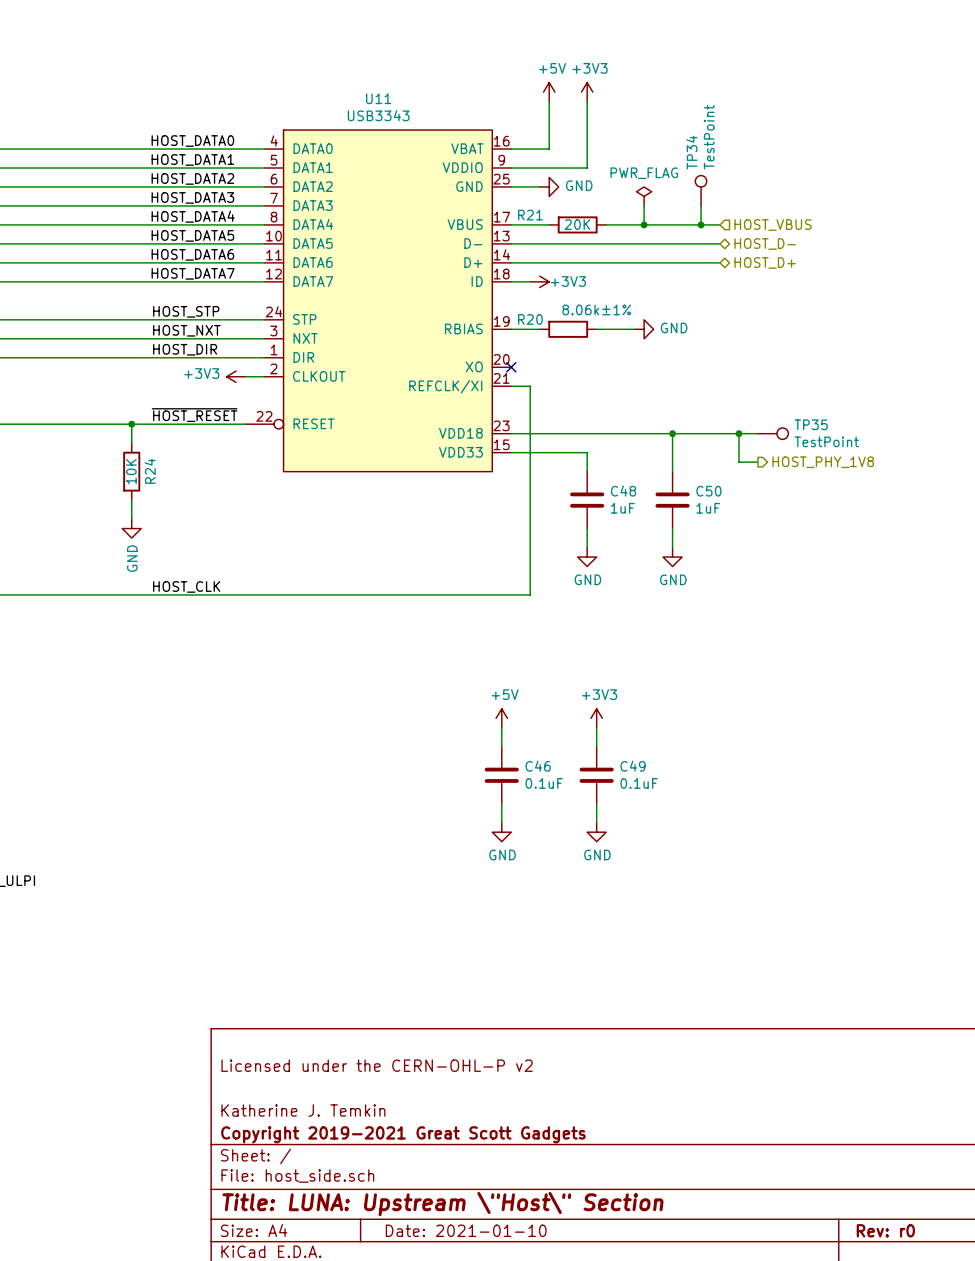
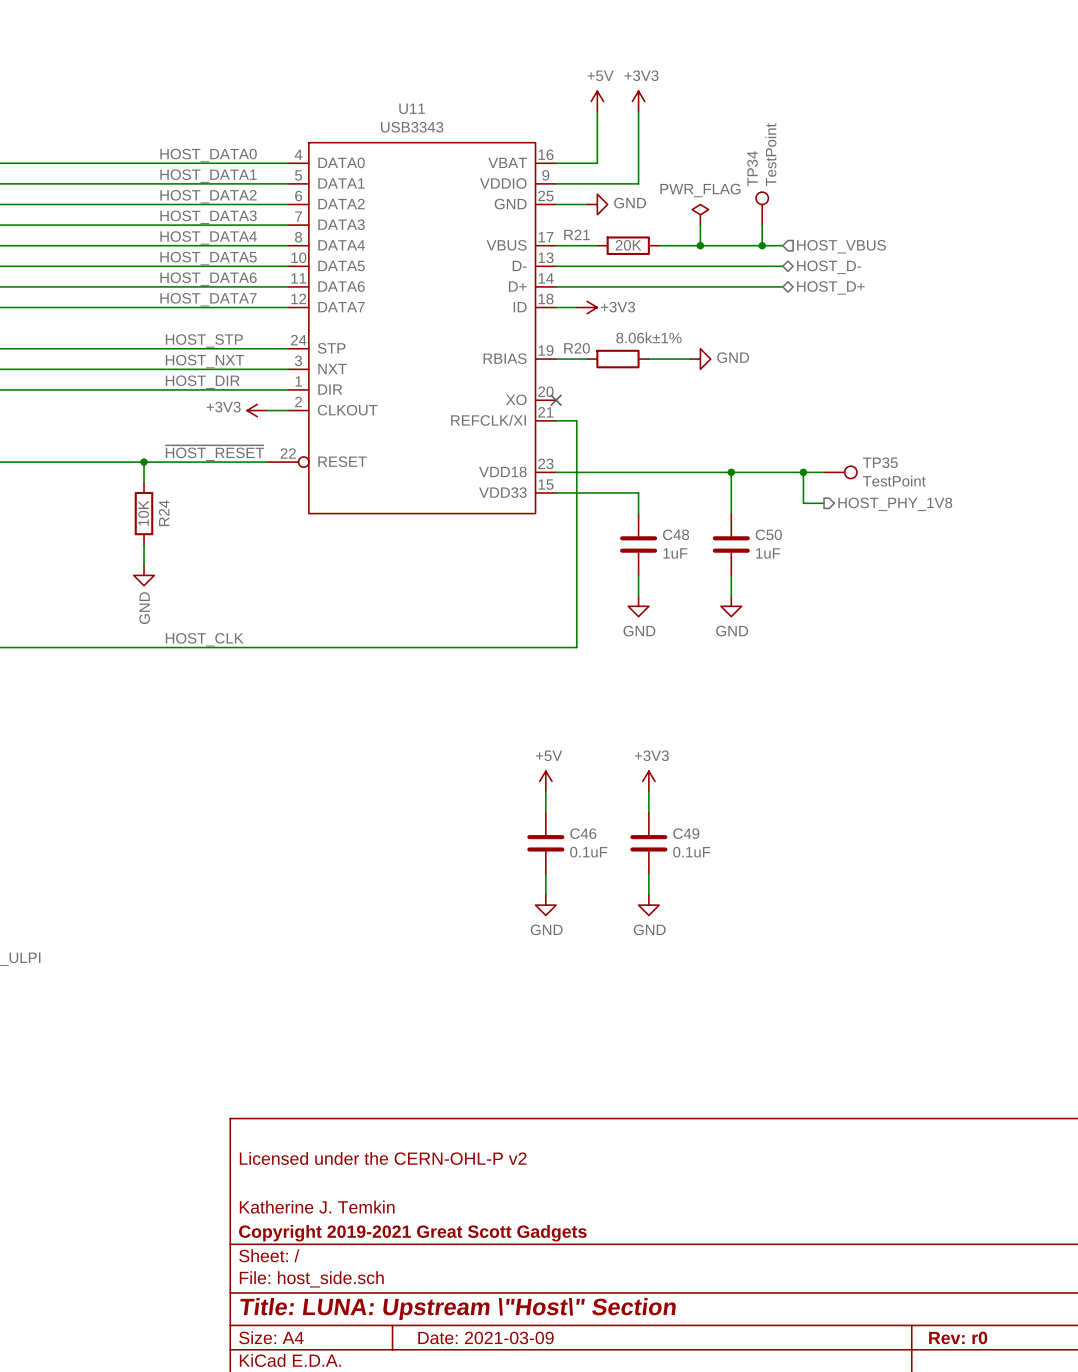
title block: Date: 2021-01-10 (466, 1230) -> Date: 2021-03-09 (486, 1337)

